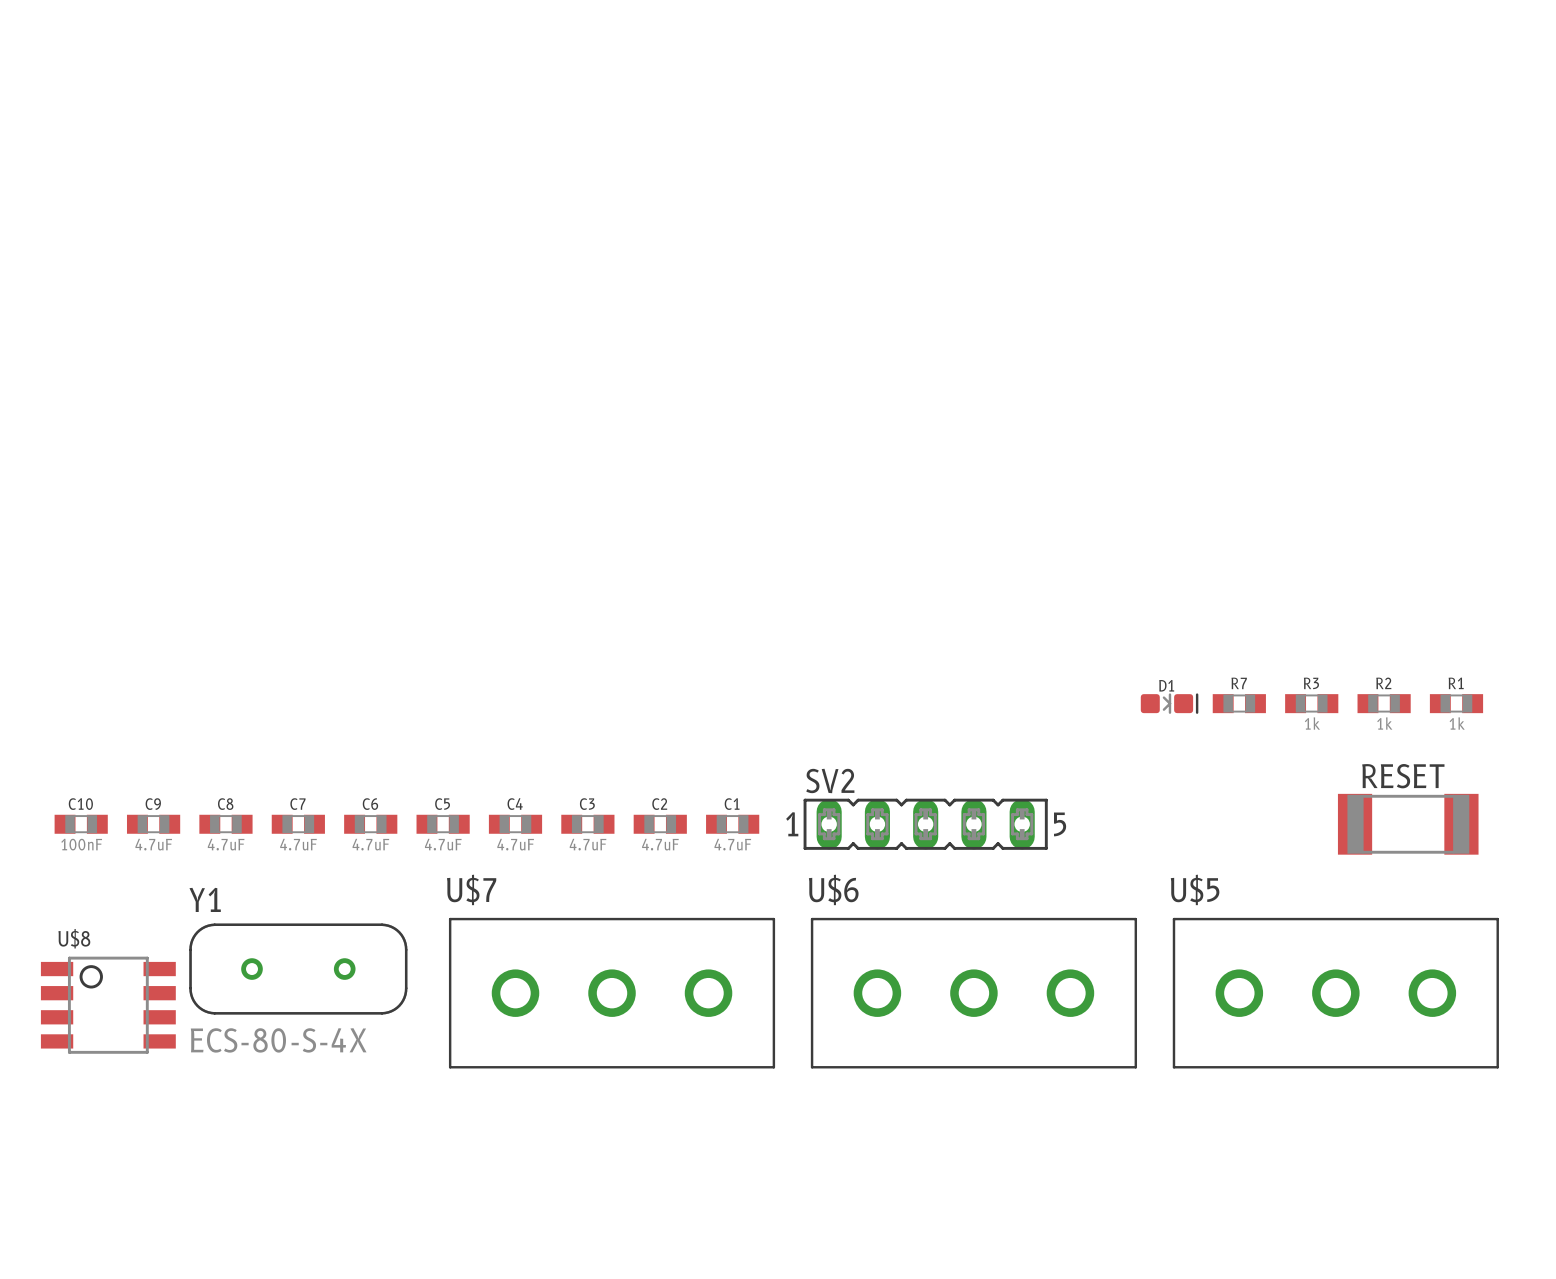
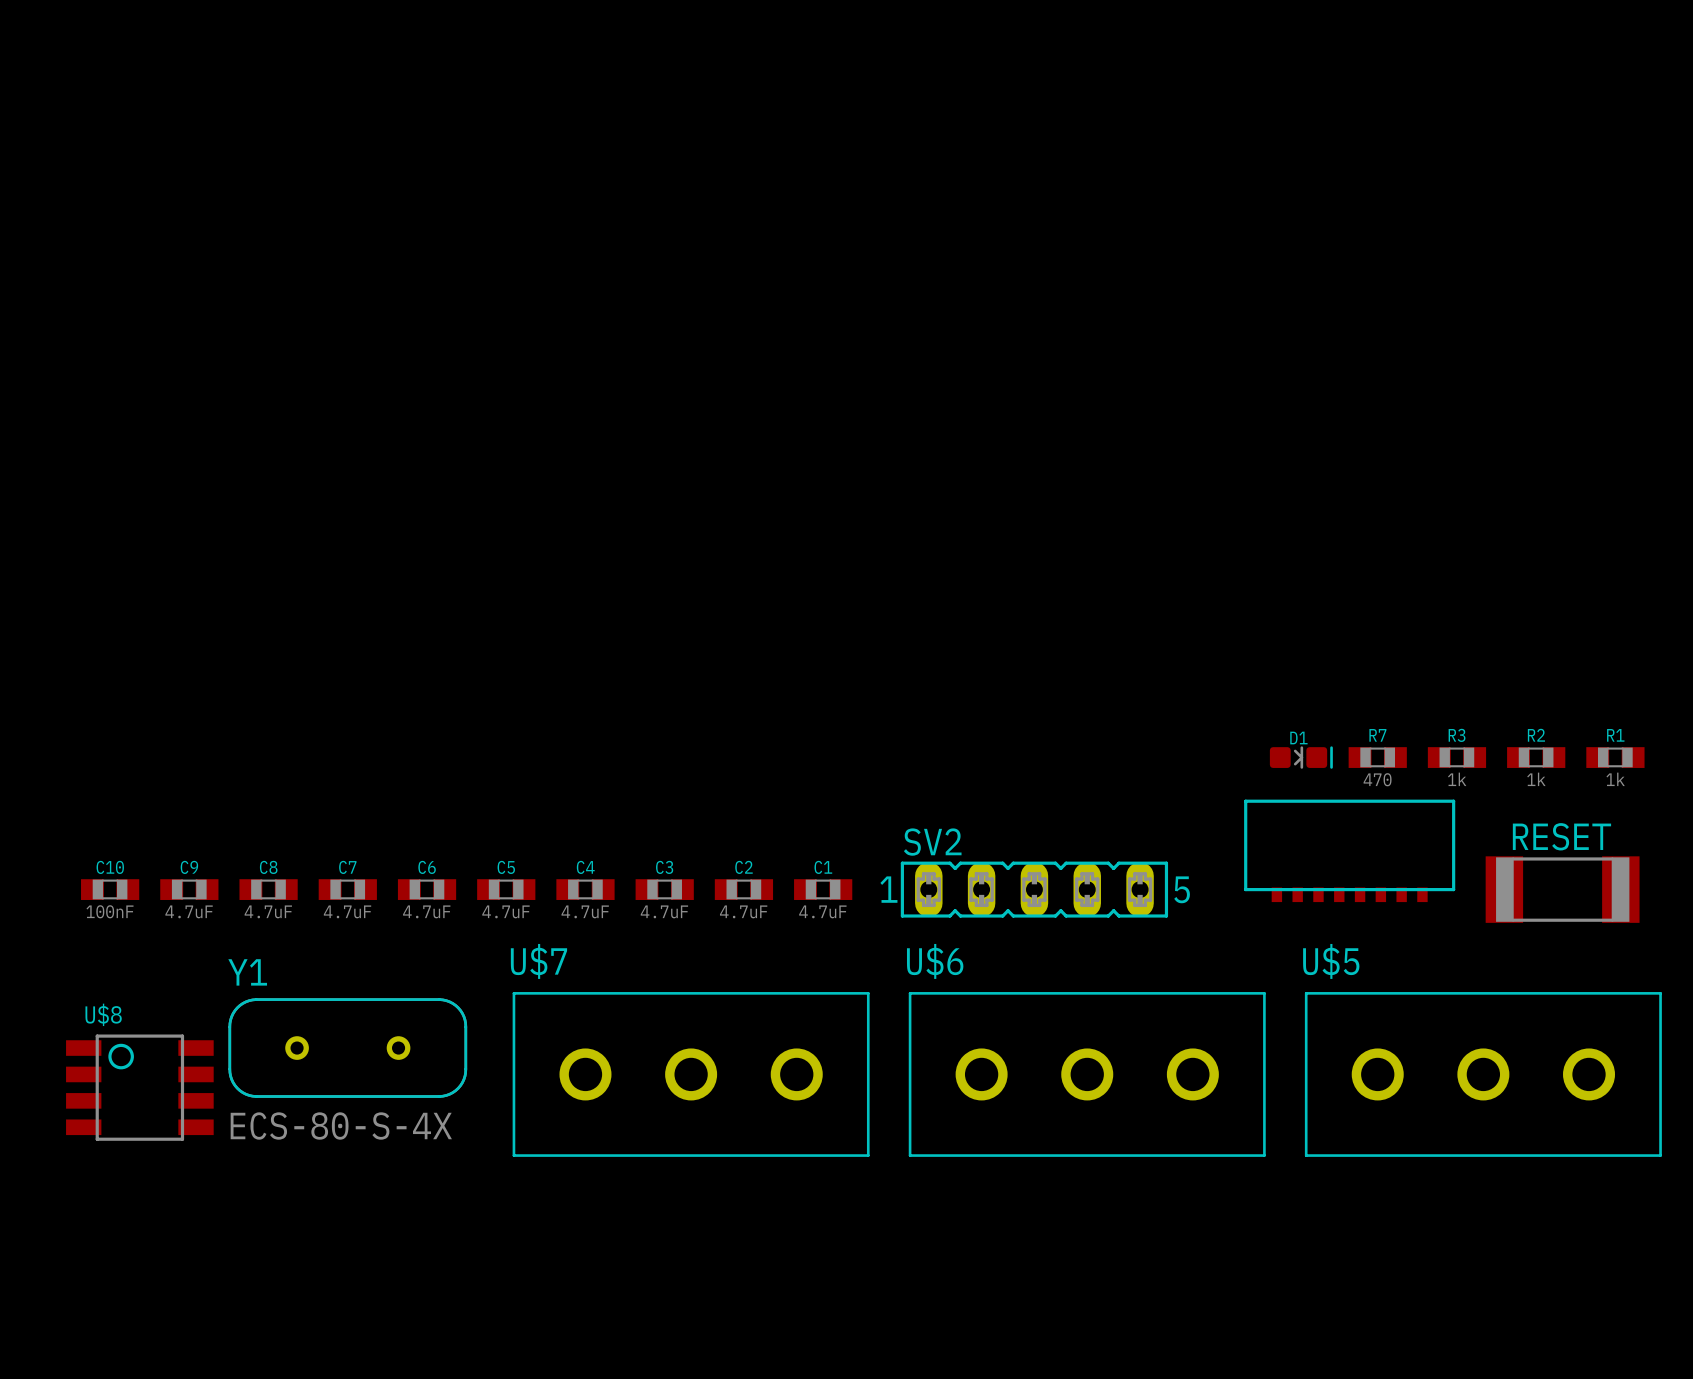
R7 value: none -> 470 (1377, 779)
part: none -> (1349, 850)

